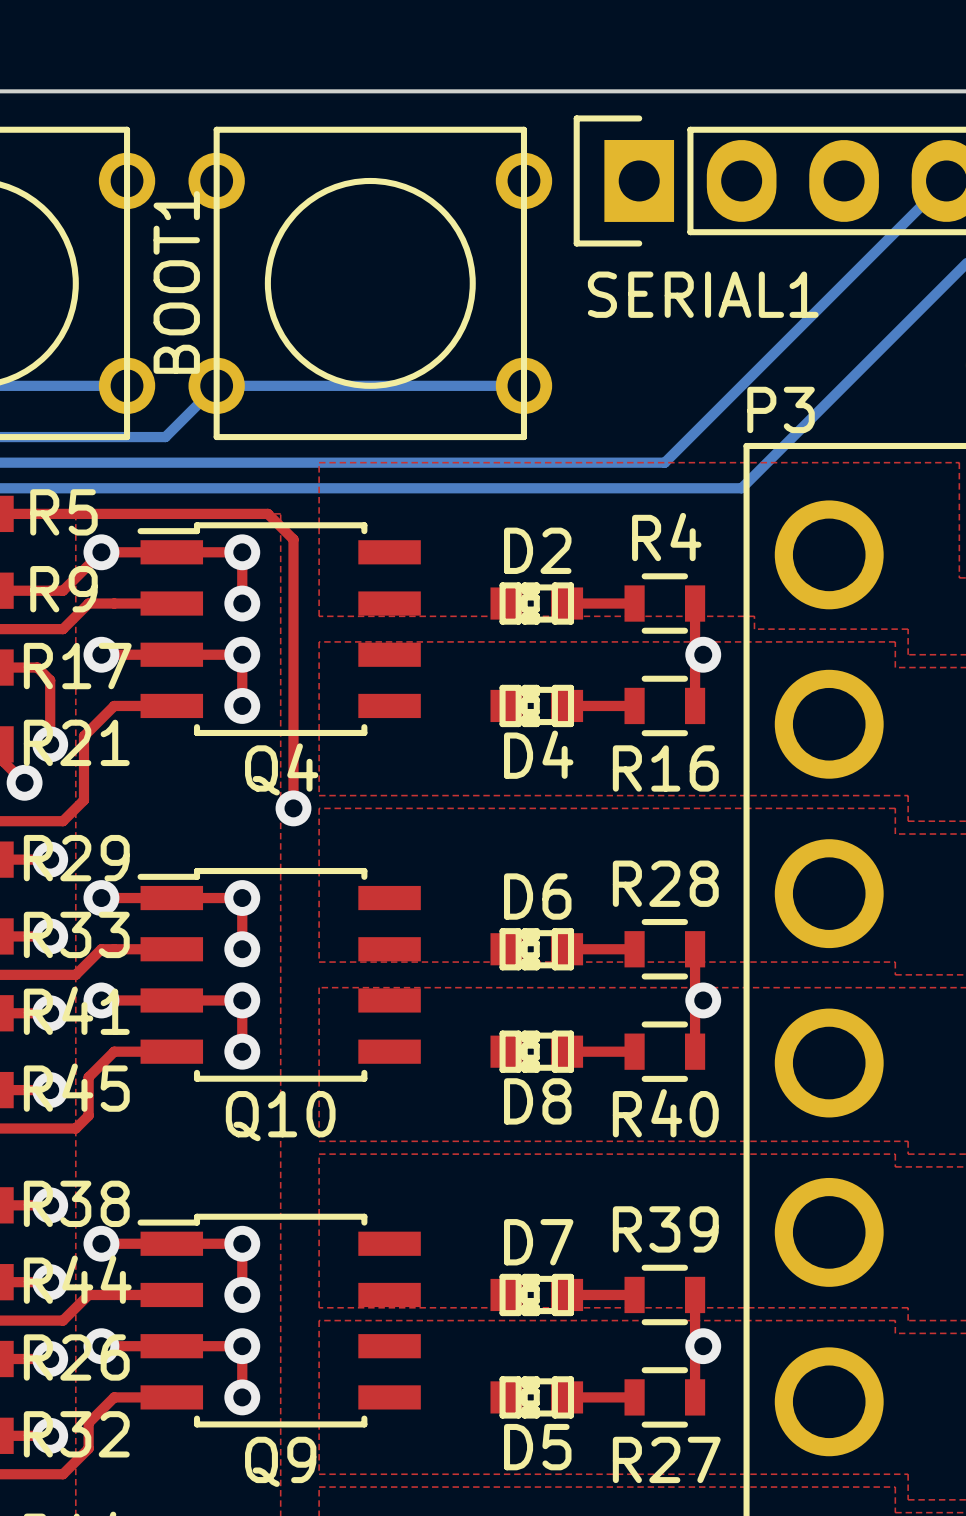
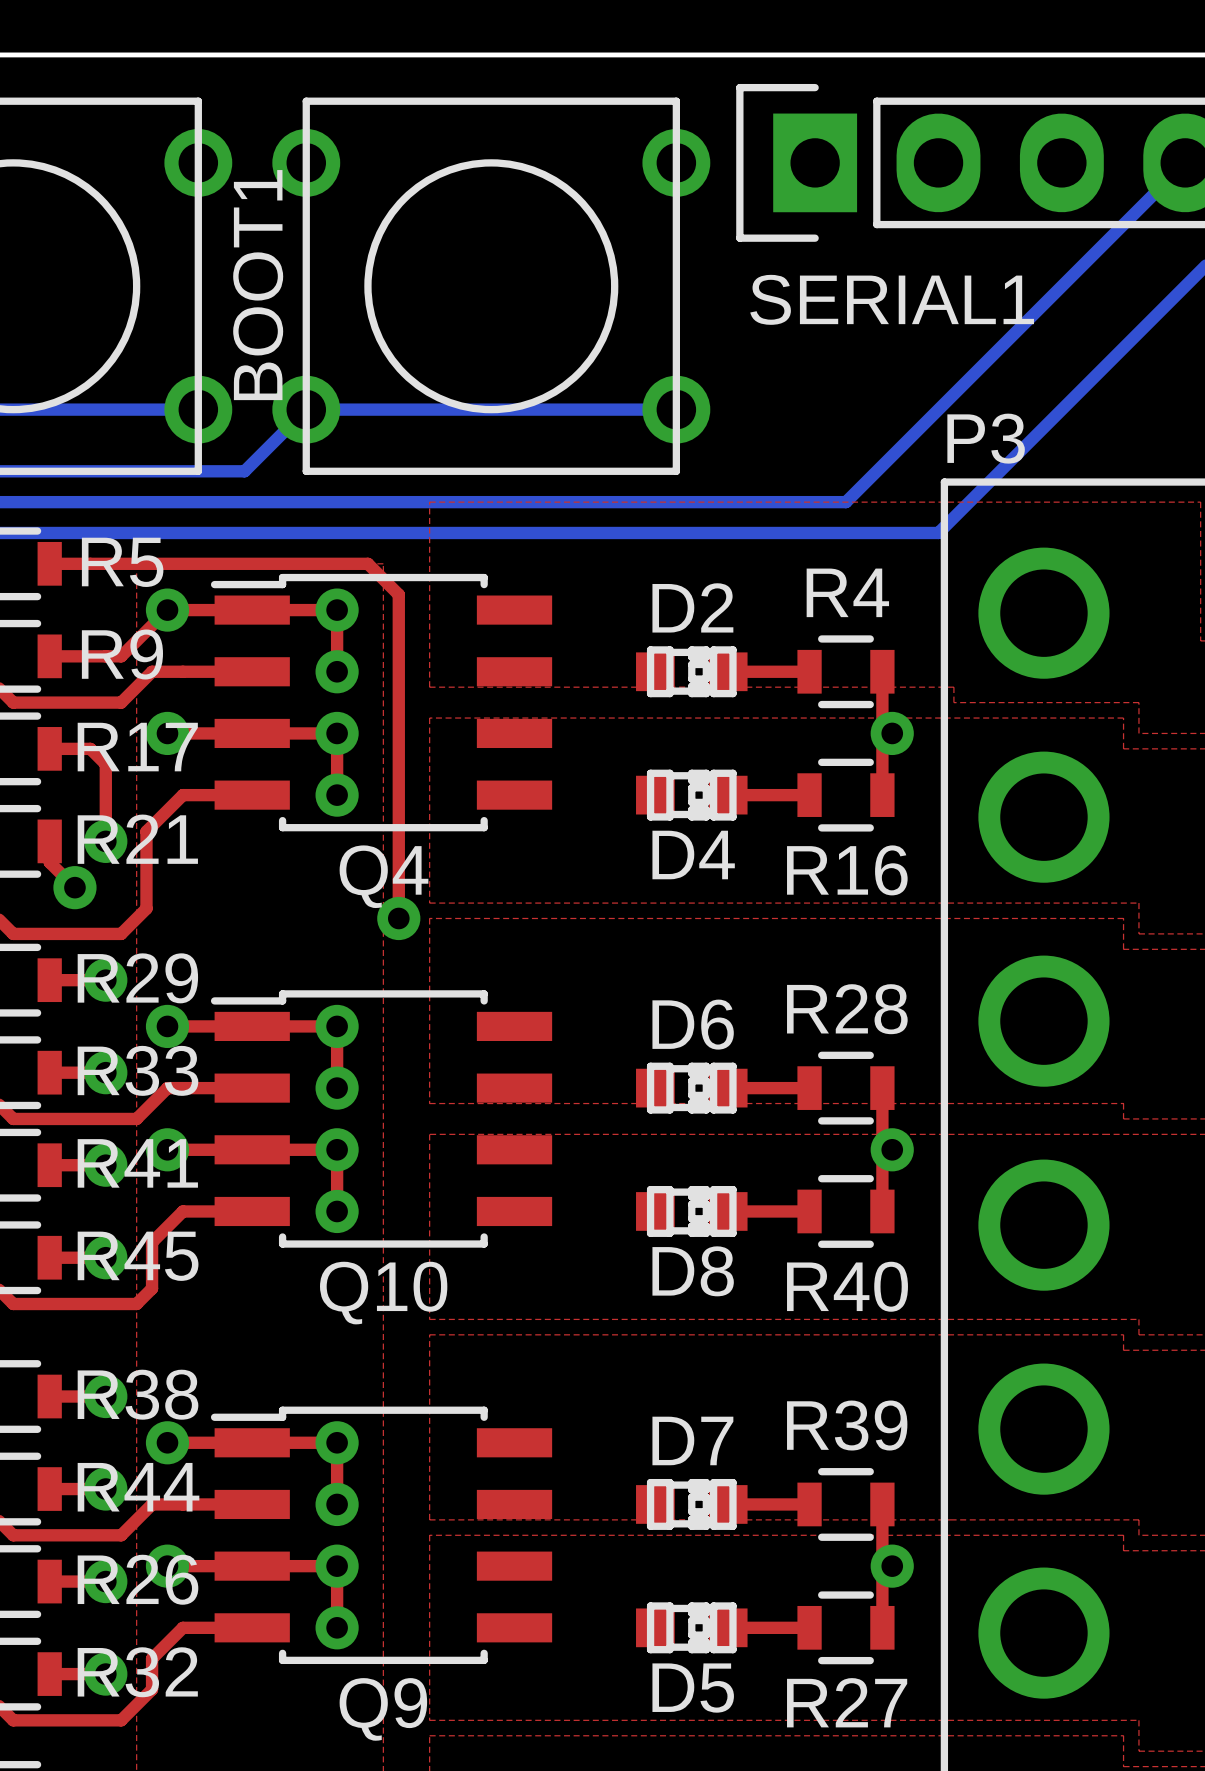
D2 rotation: 0° (536, 603) -> 180° (691, 671)
D4 rotation: 0° (536, 705) -> 180° (691, 795)
D6 rotation: 0° (536, 949) -> 180° (691, 1088)
D8 rotation: 0° (536, 1051) -> 180° (691, 1211)
D7 rotation: 0° (536, 1294) -> 180° (691, 1504)
D5 rotation: 0° (536, 1397) -> 180° (691, 1627)

